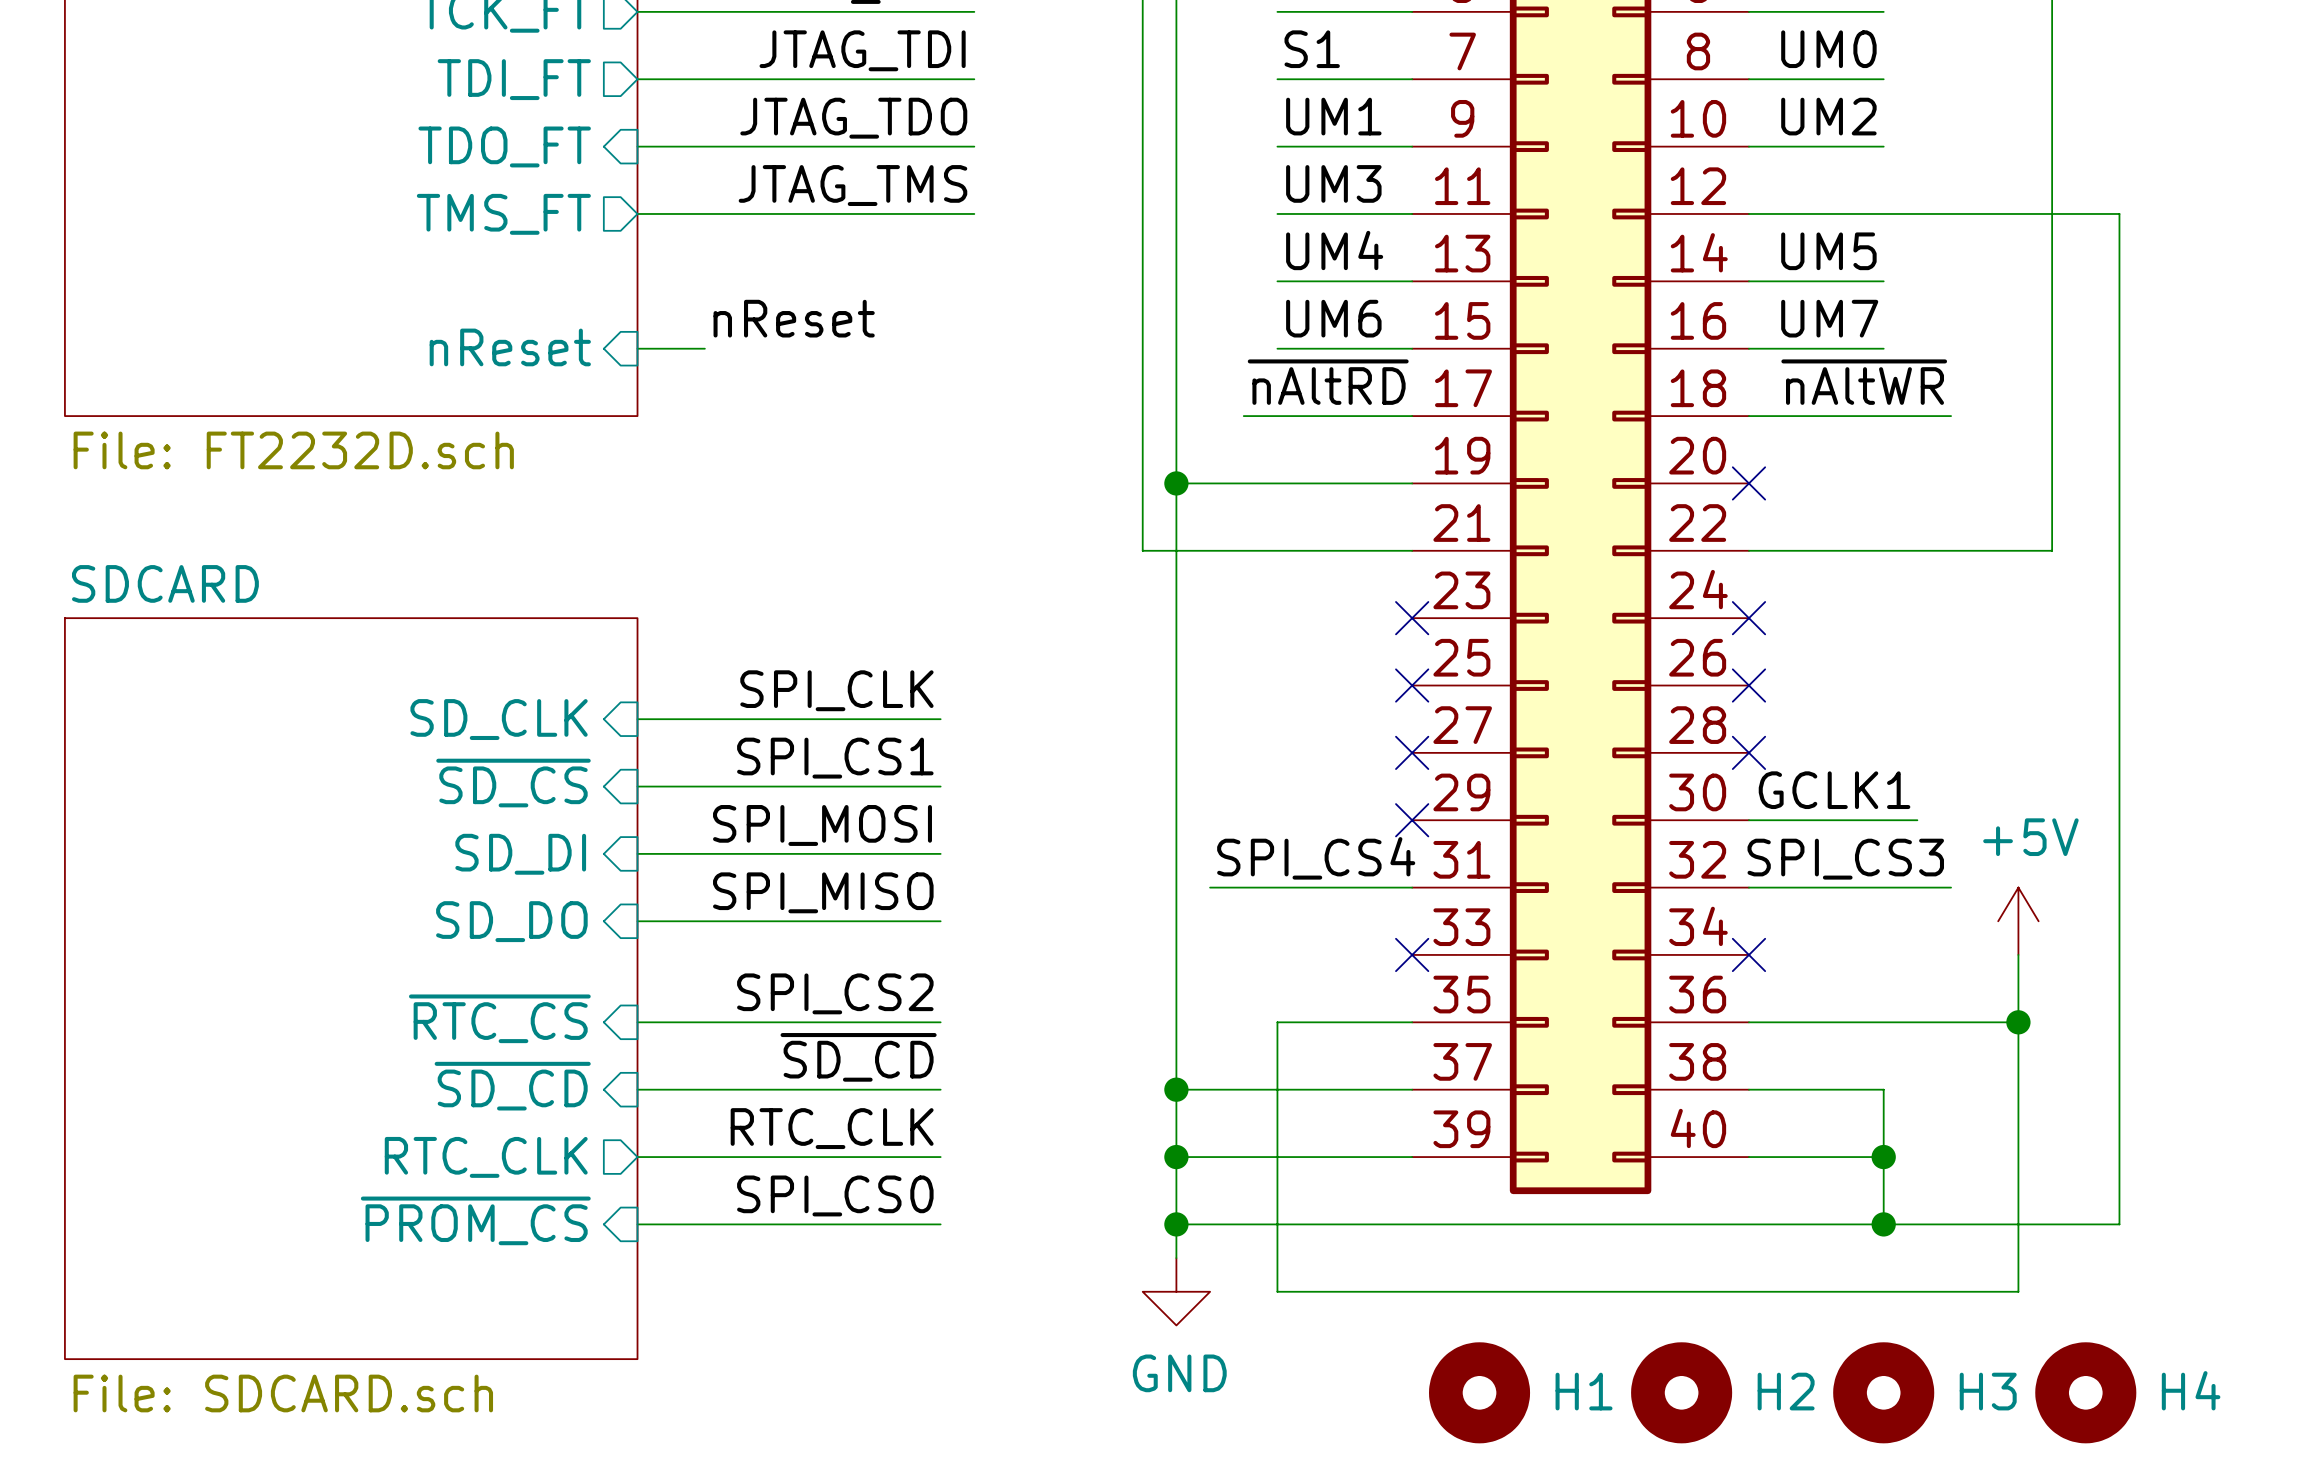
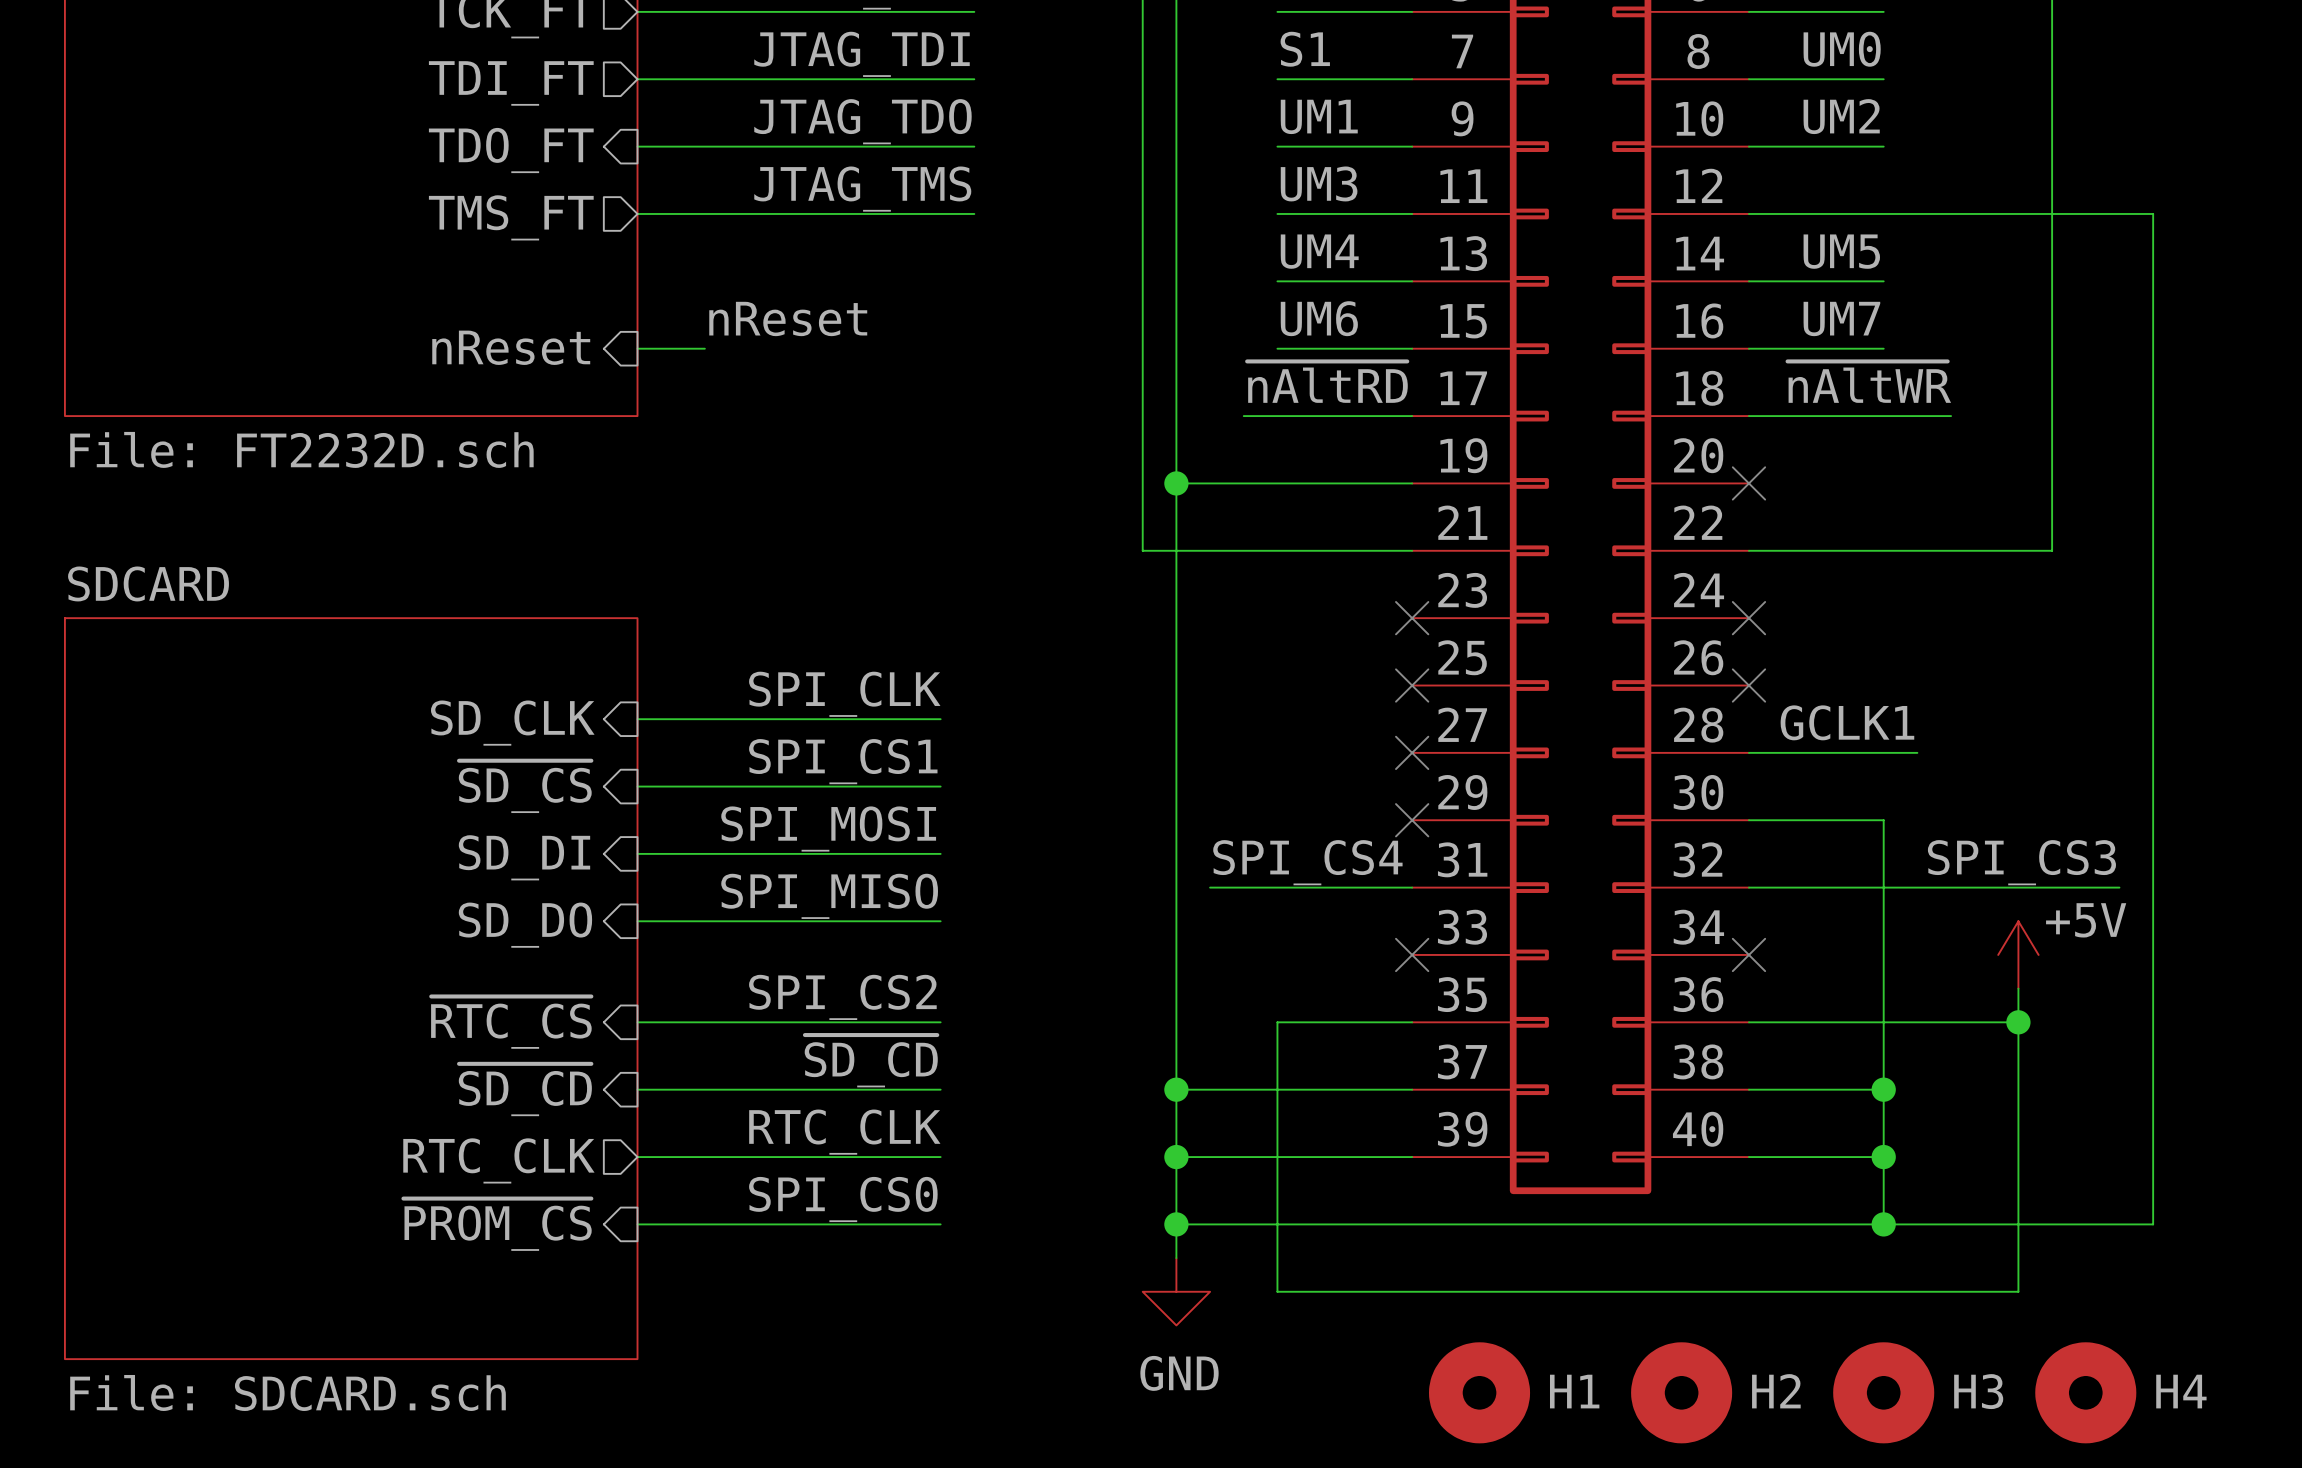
wire: (2119, 213) (2119, 1224) -> (2119, 213) (2153, 213) (2153, 1224) (2119, 1224)
wire: none -> (1748, 752) (1917, 752)
no-connect mark: (1748, 752) -> none
label position: GCLK1 (1834, 790) -> GCLK1 (1847, 722)
wire: (1883, 820) (1917, 820) -> (1883, 820) (1883, 1089)
power symbol text position: +5V (2030, 837) -> +5V (2086, 920)
label position: SPI_CS3 (1845, 859) -> SPI_CS3 (2021, 862)
wire: none -> (1951, 887) (2119, 887)
power symbol position: +5V (2018, 921) -> +5V (2018, 954)
junction: none -> (1883, 1089)

